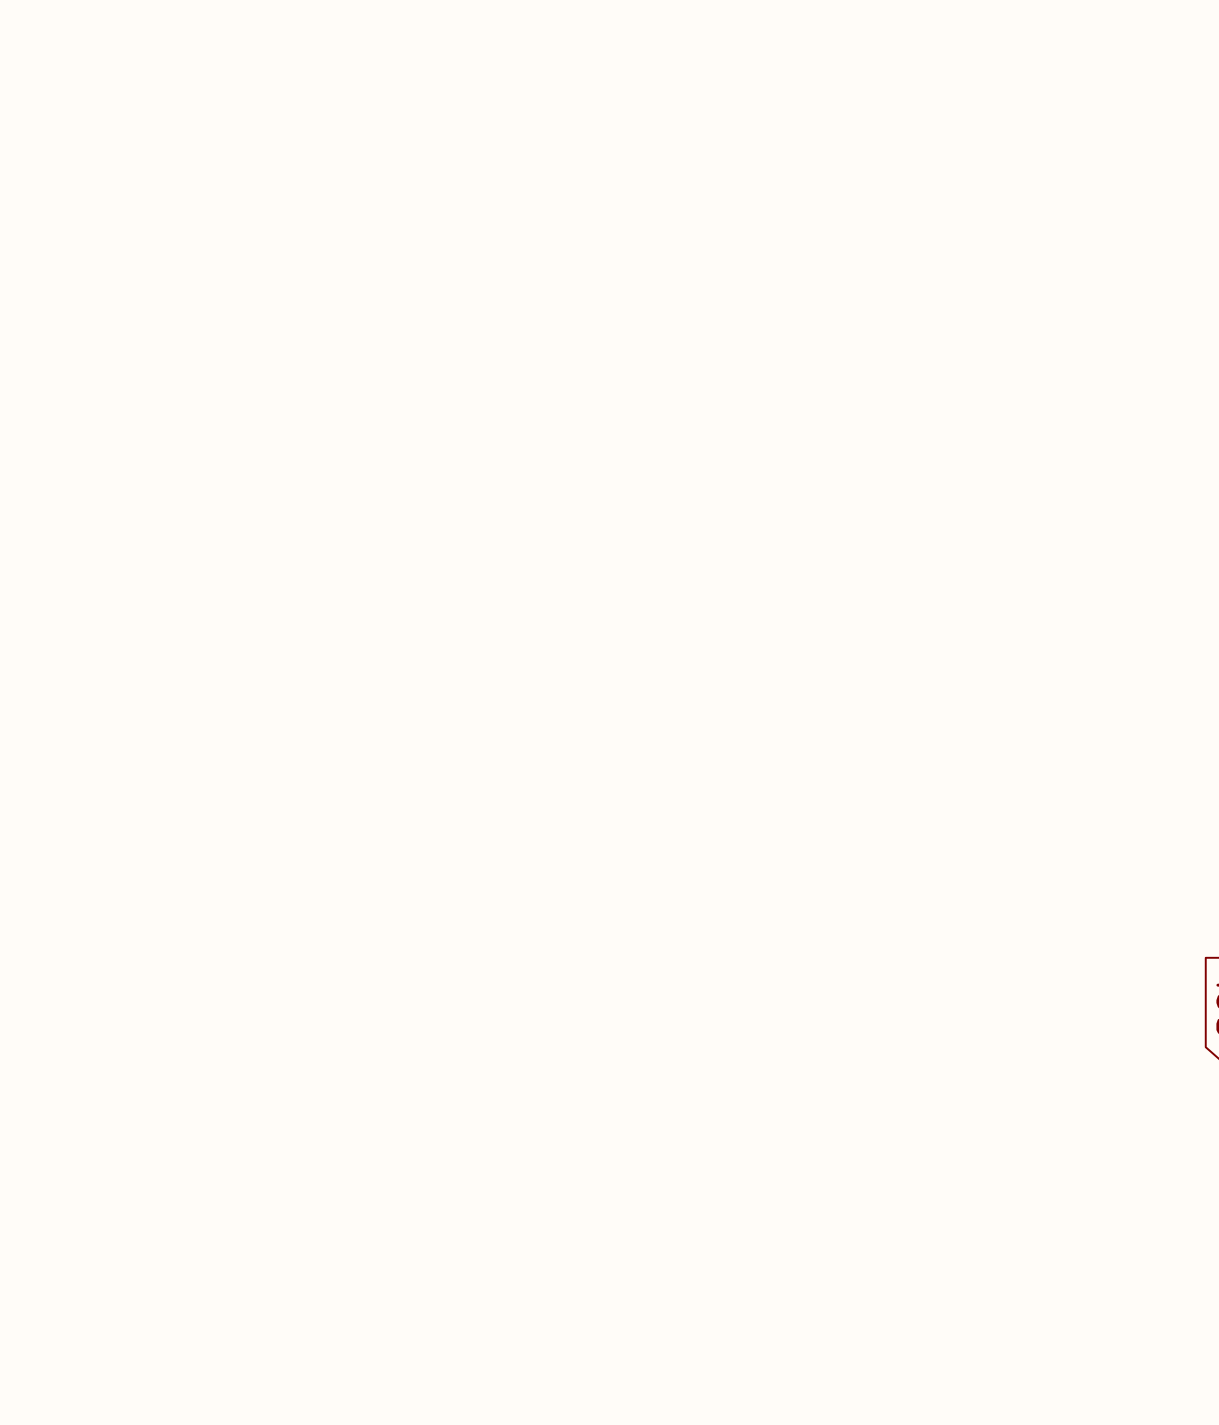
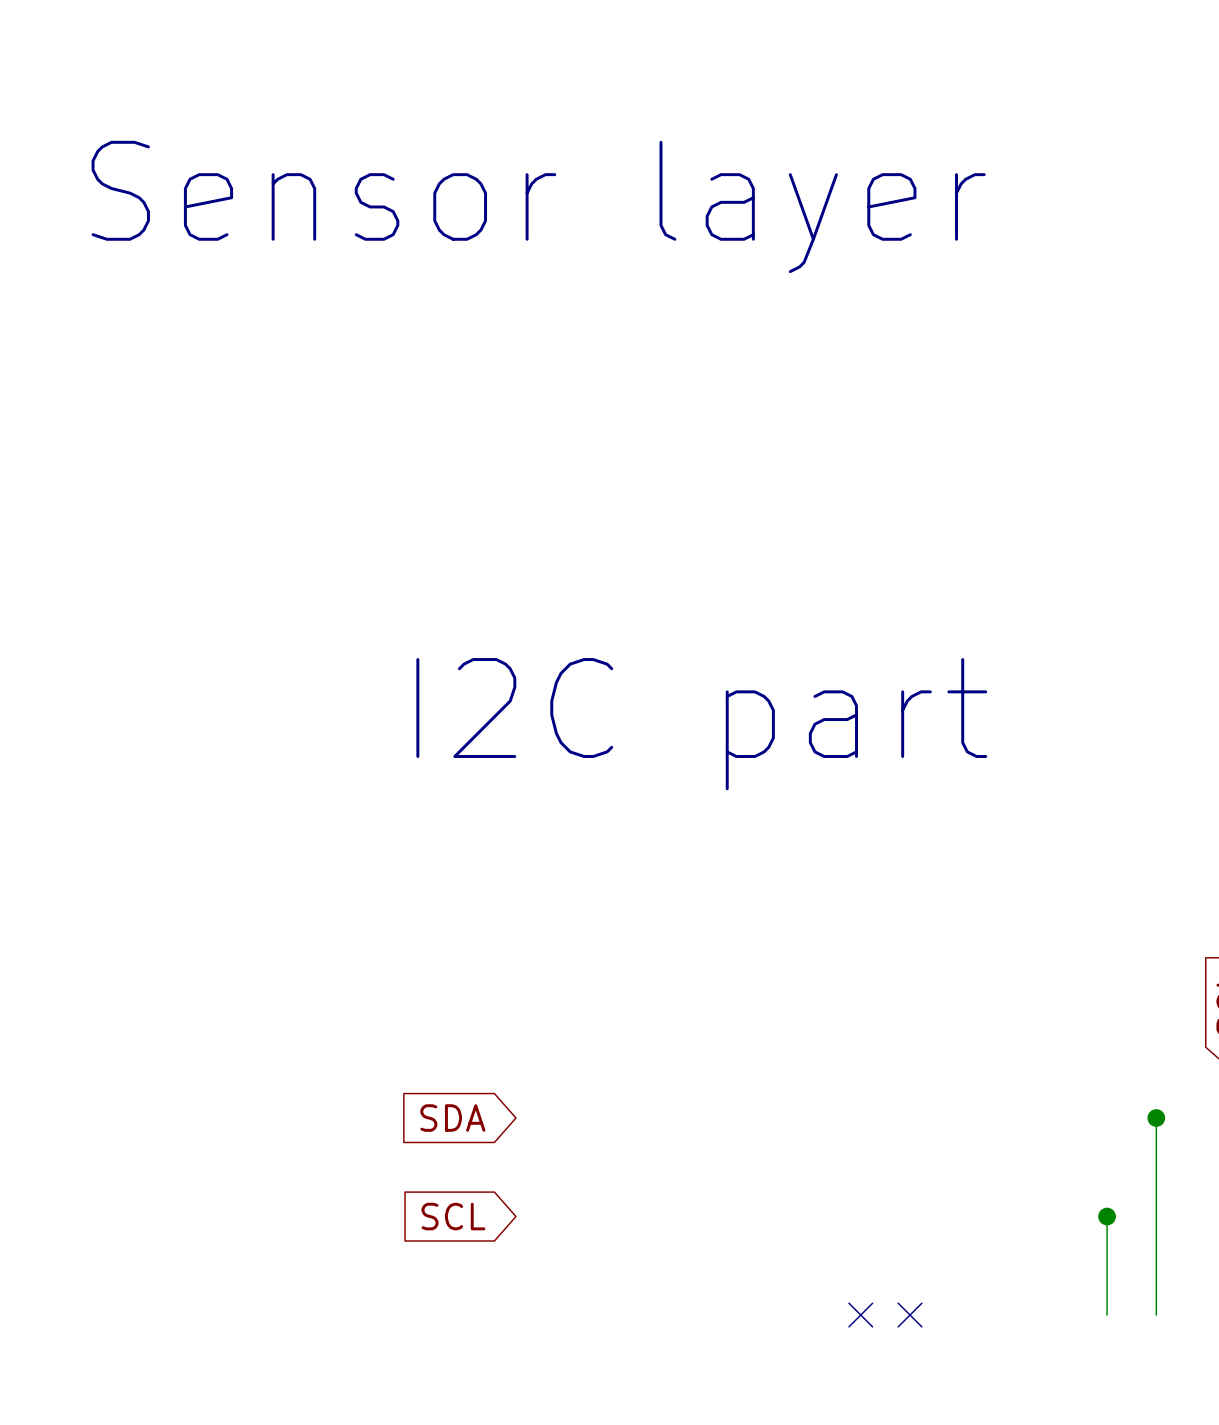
text: none -> Sensor layer (538, 206)
text: none -> I2C part (701, 724)
global label: none -> SDA (452, 1118)
wire: none -> (1156, 1118) (1156, 1315)
junction: none -> (1156, 1118)
global label: none -> SCL (453, 1216)
wire: none -> (1107, 1216) (1107, 1315)
junction: none -> (1107, 1216)
no-connect mark: none -> (860, 1315)
no-connect mark: none -> (910, 1315)

